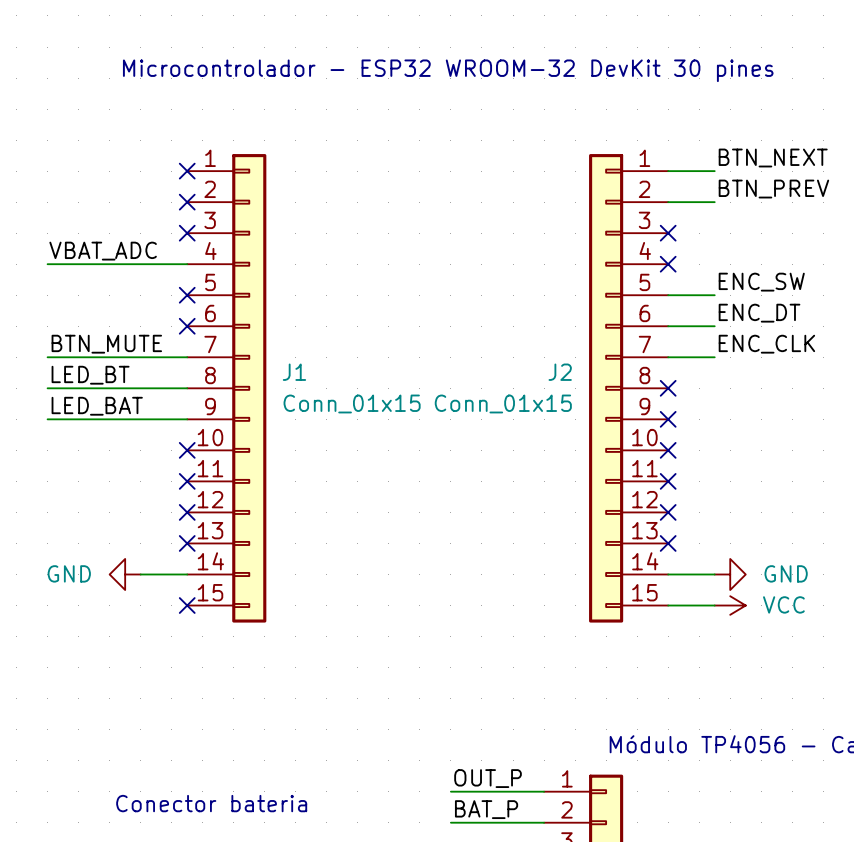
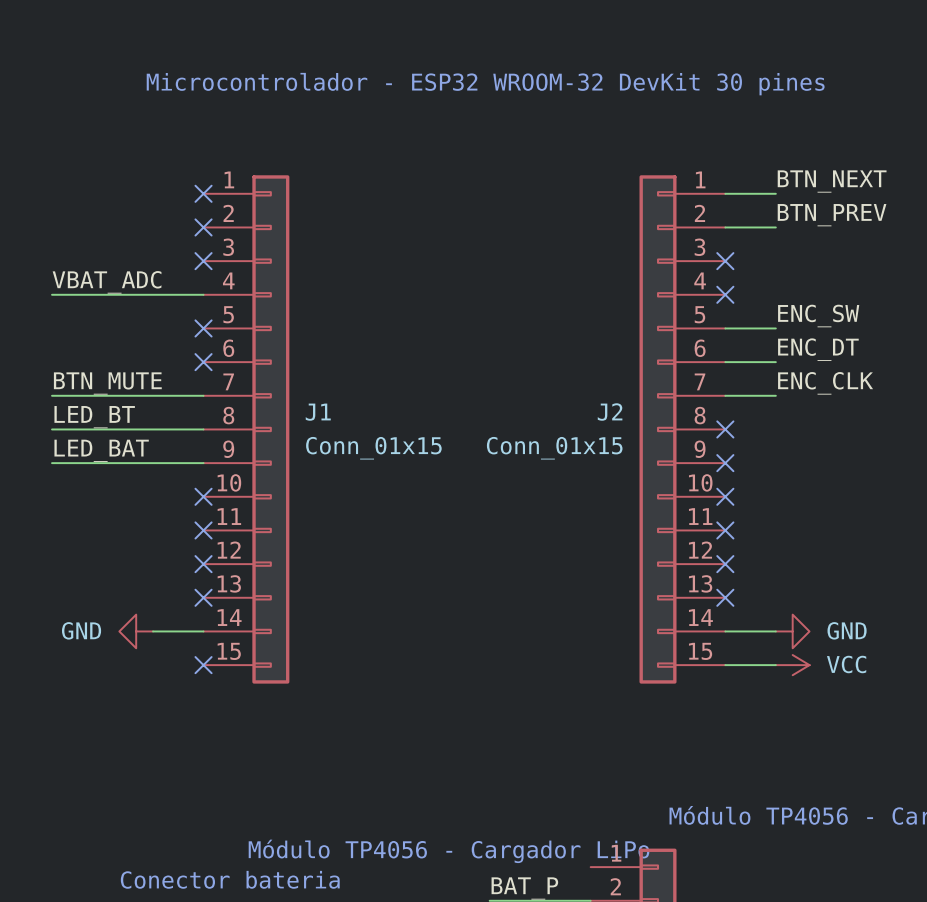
text: none -> Módulo TP4056 - Cargador LiPo (449, 851)
label: OUT_P (488, 778) -> none
wire: (450, 791) (544, 791) -> none

